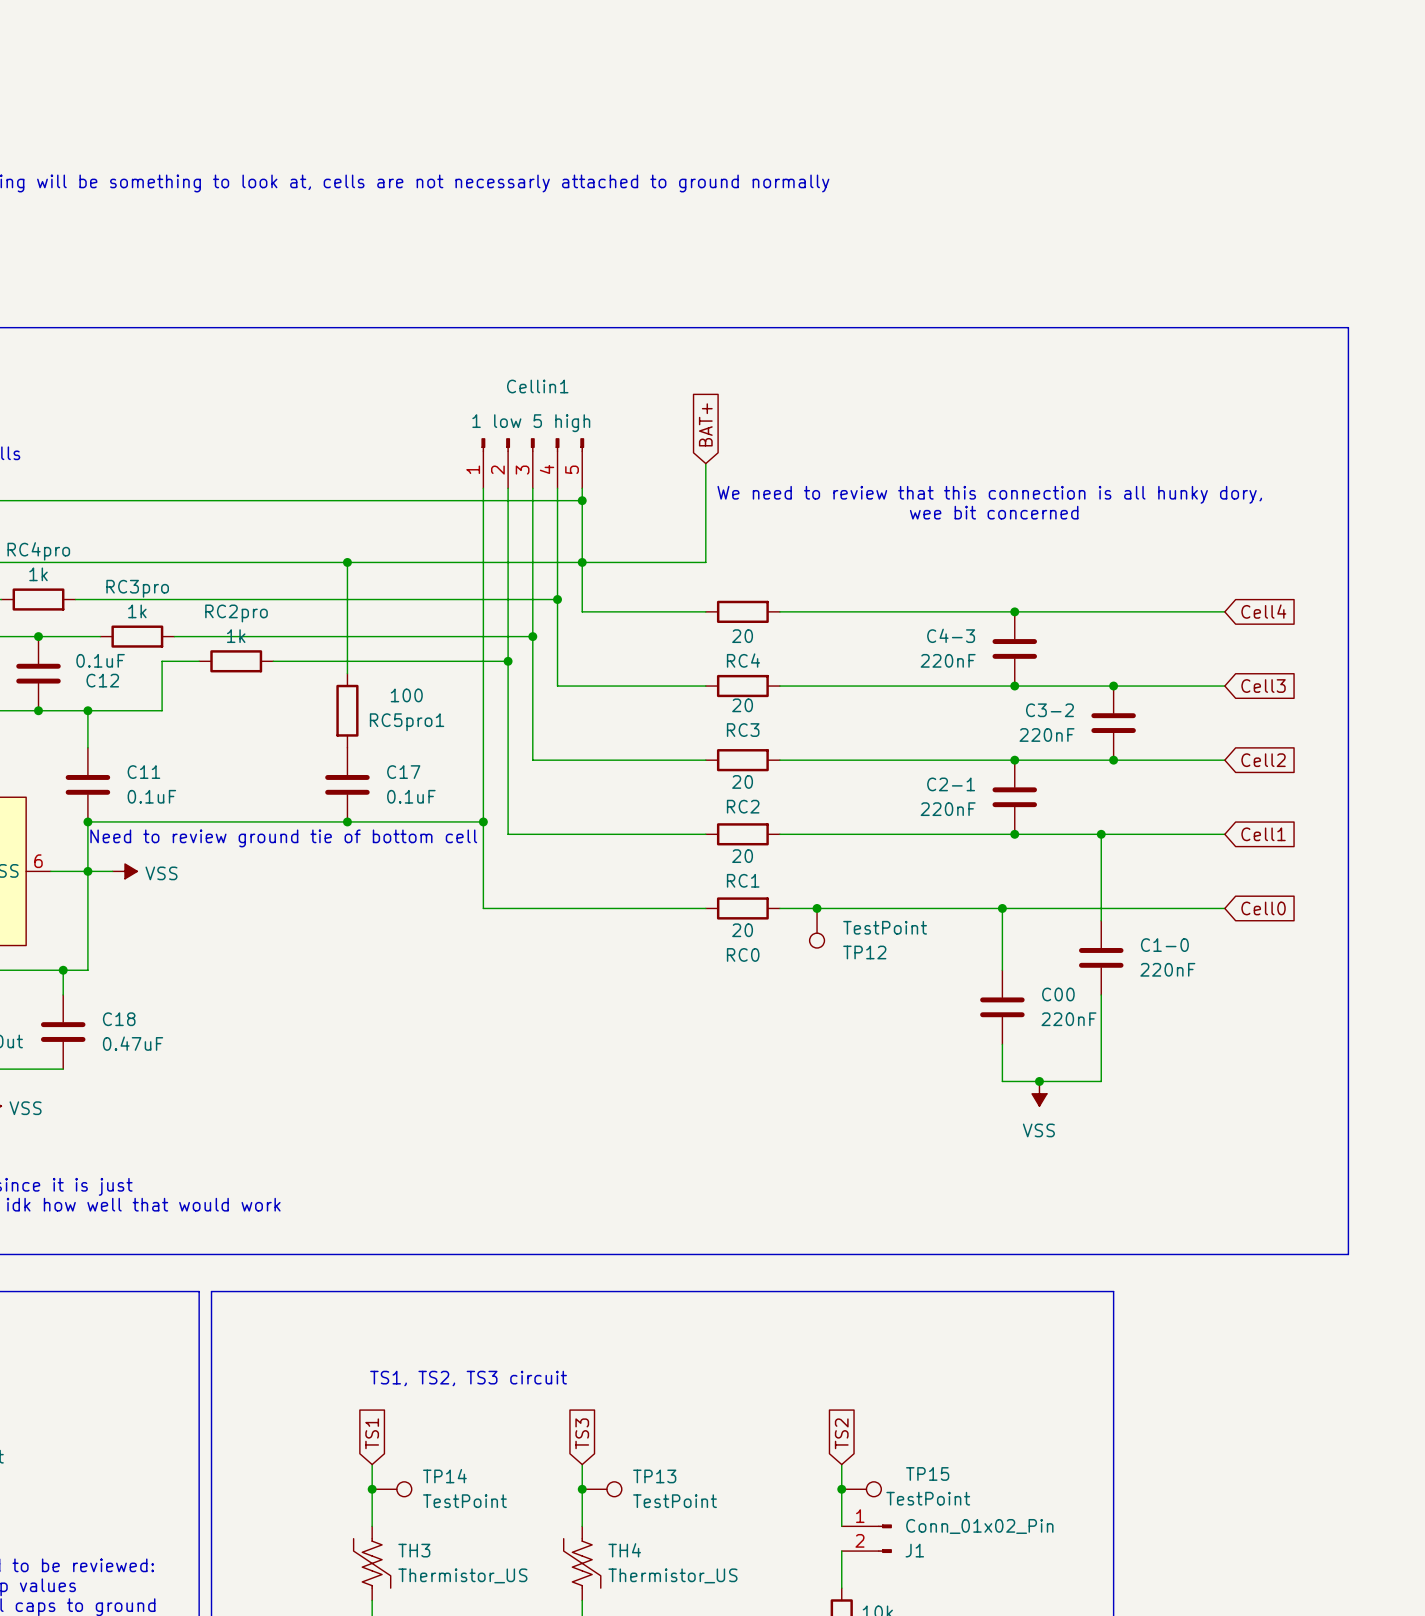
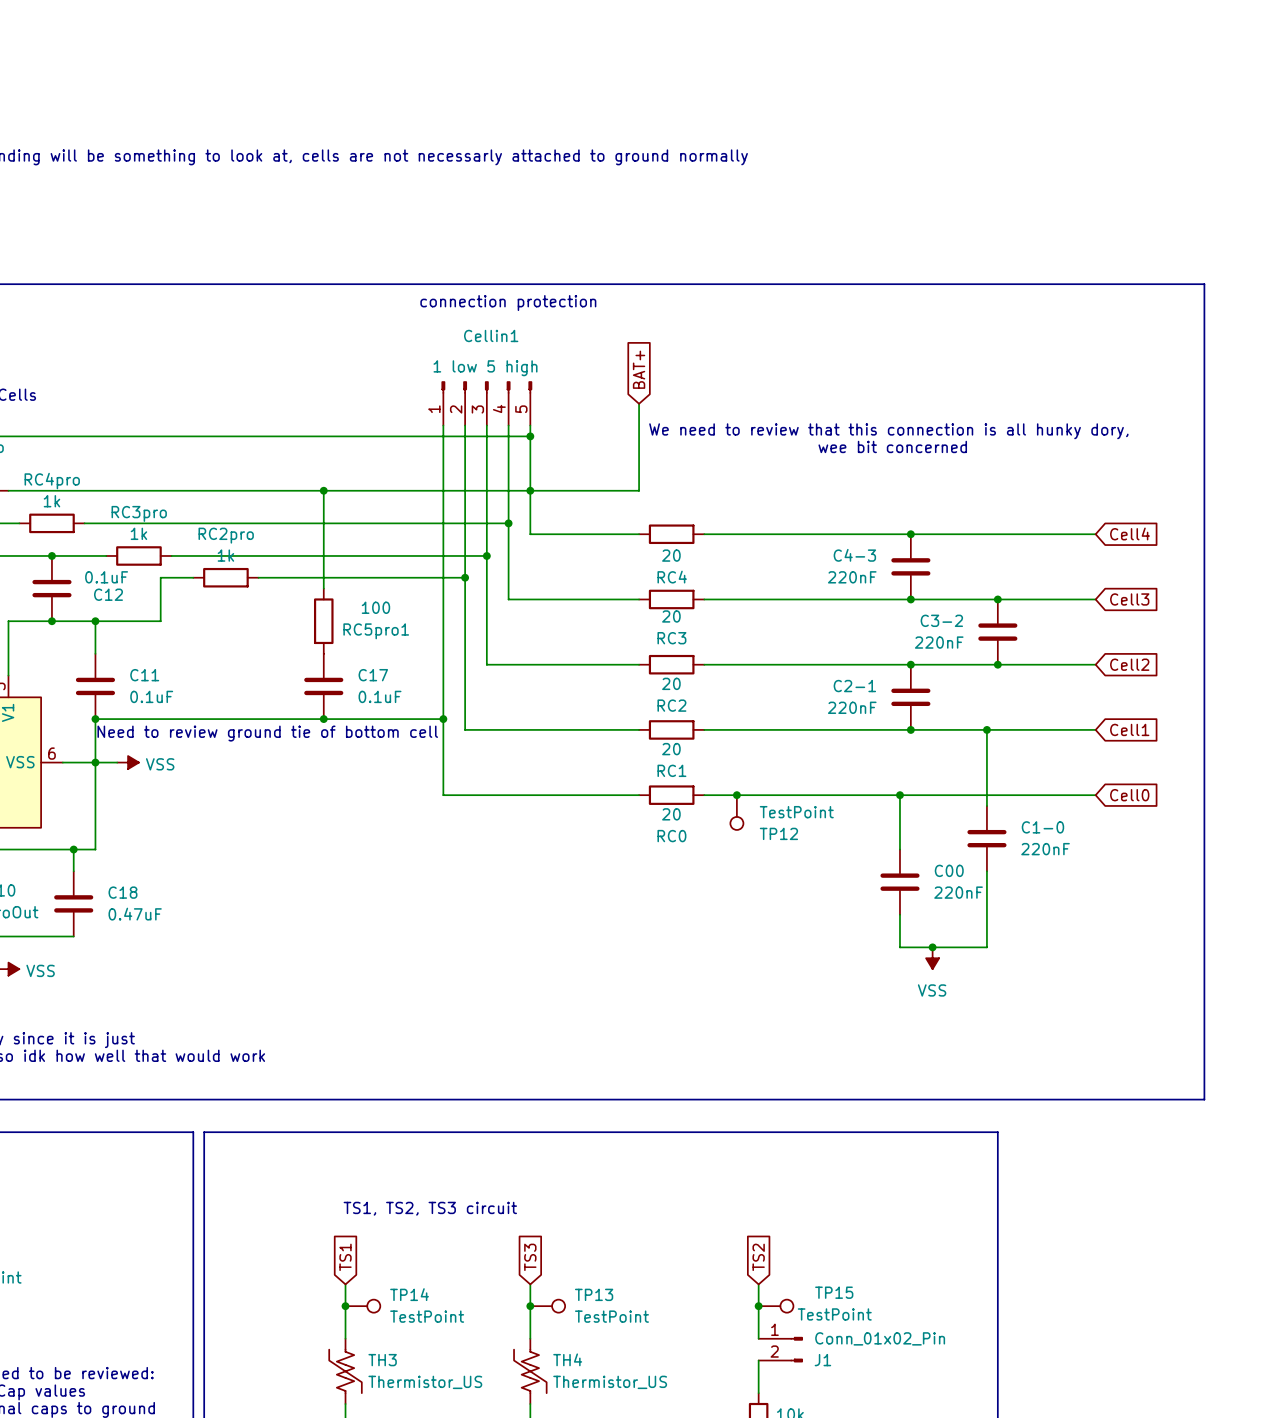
text: none -> connection protection (508, 303)

